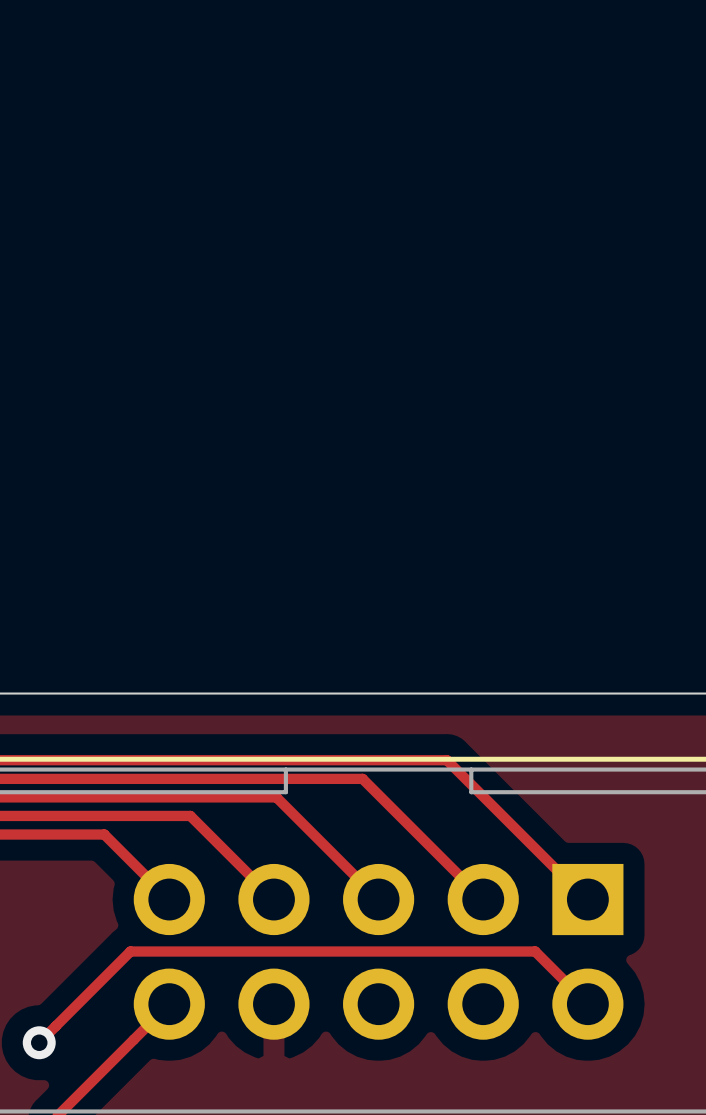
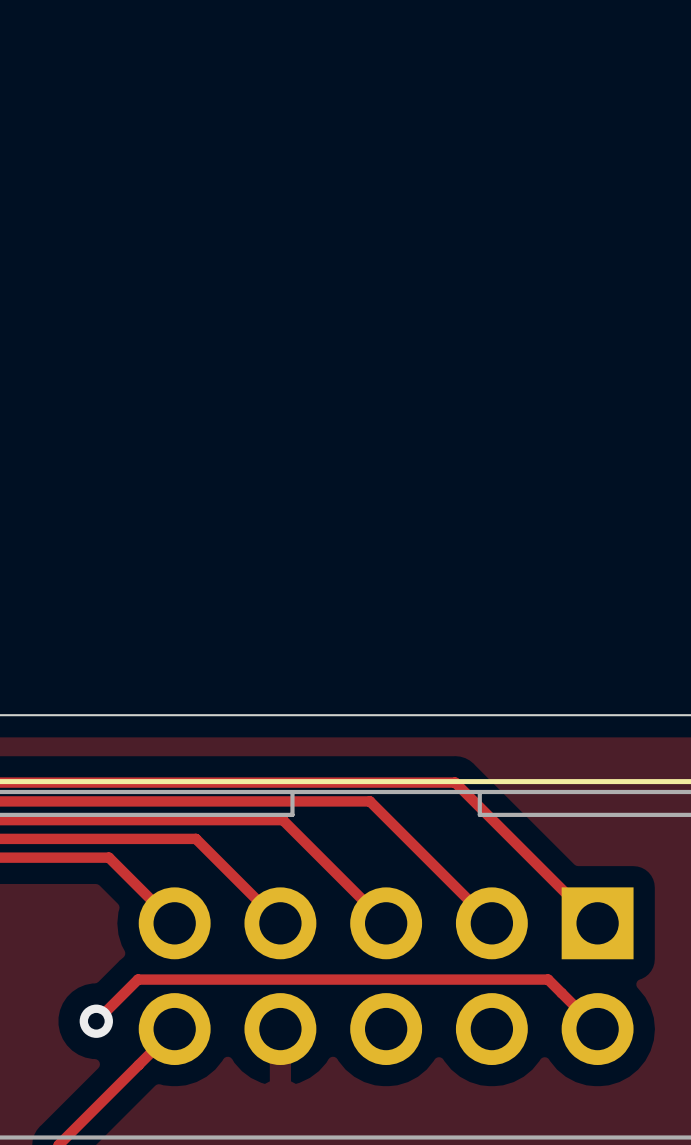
track: (538, 955) (535, 951) (130, 951) (39, 1042) -> (548, 979) (137, 979) (96, 1021)
via position: (39, 1042) -> (96, 1021)

